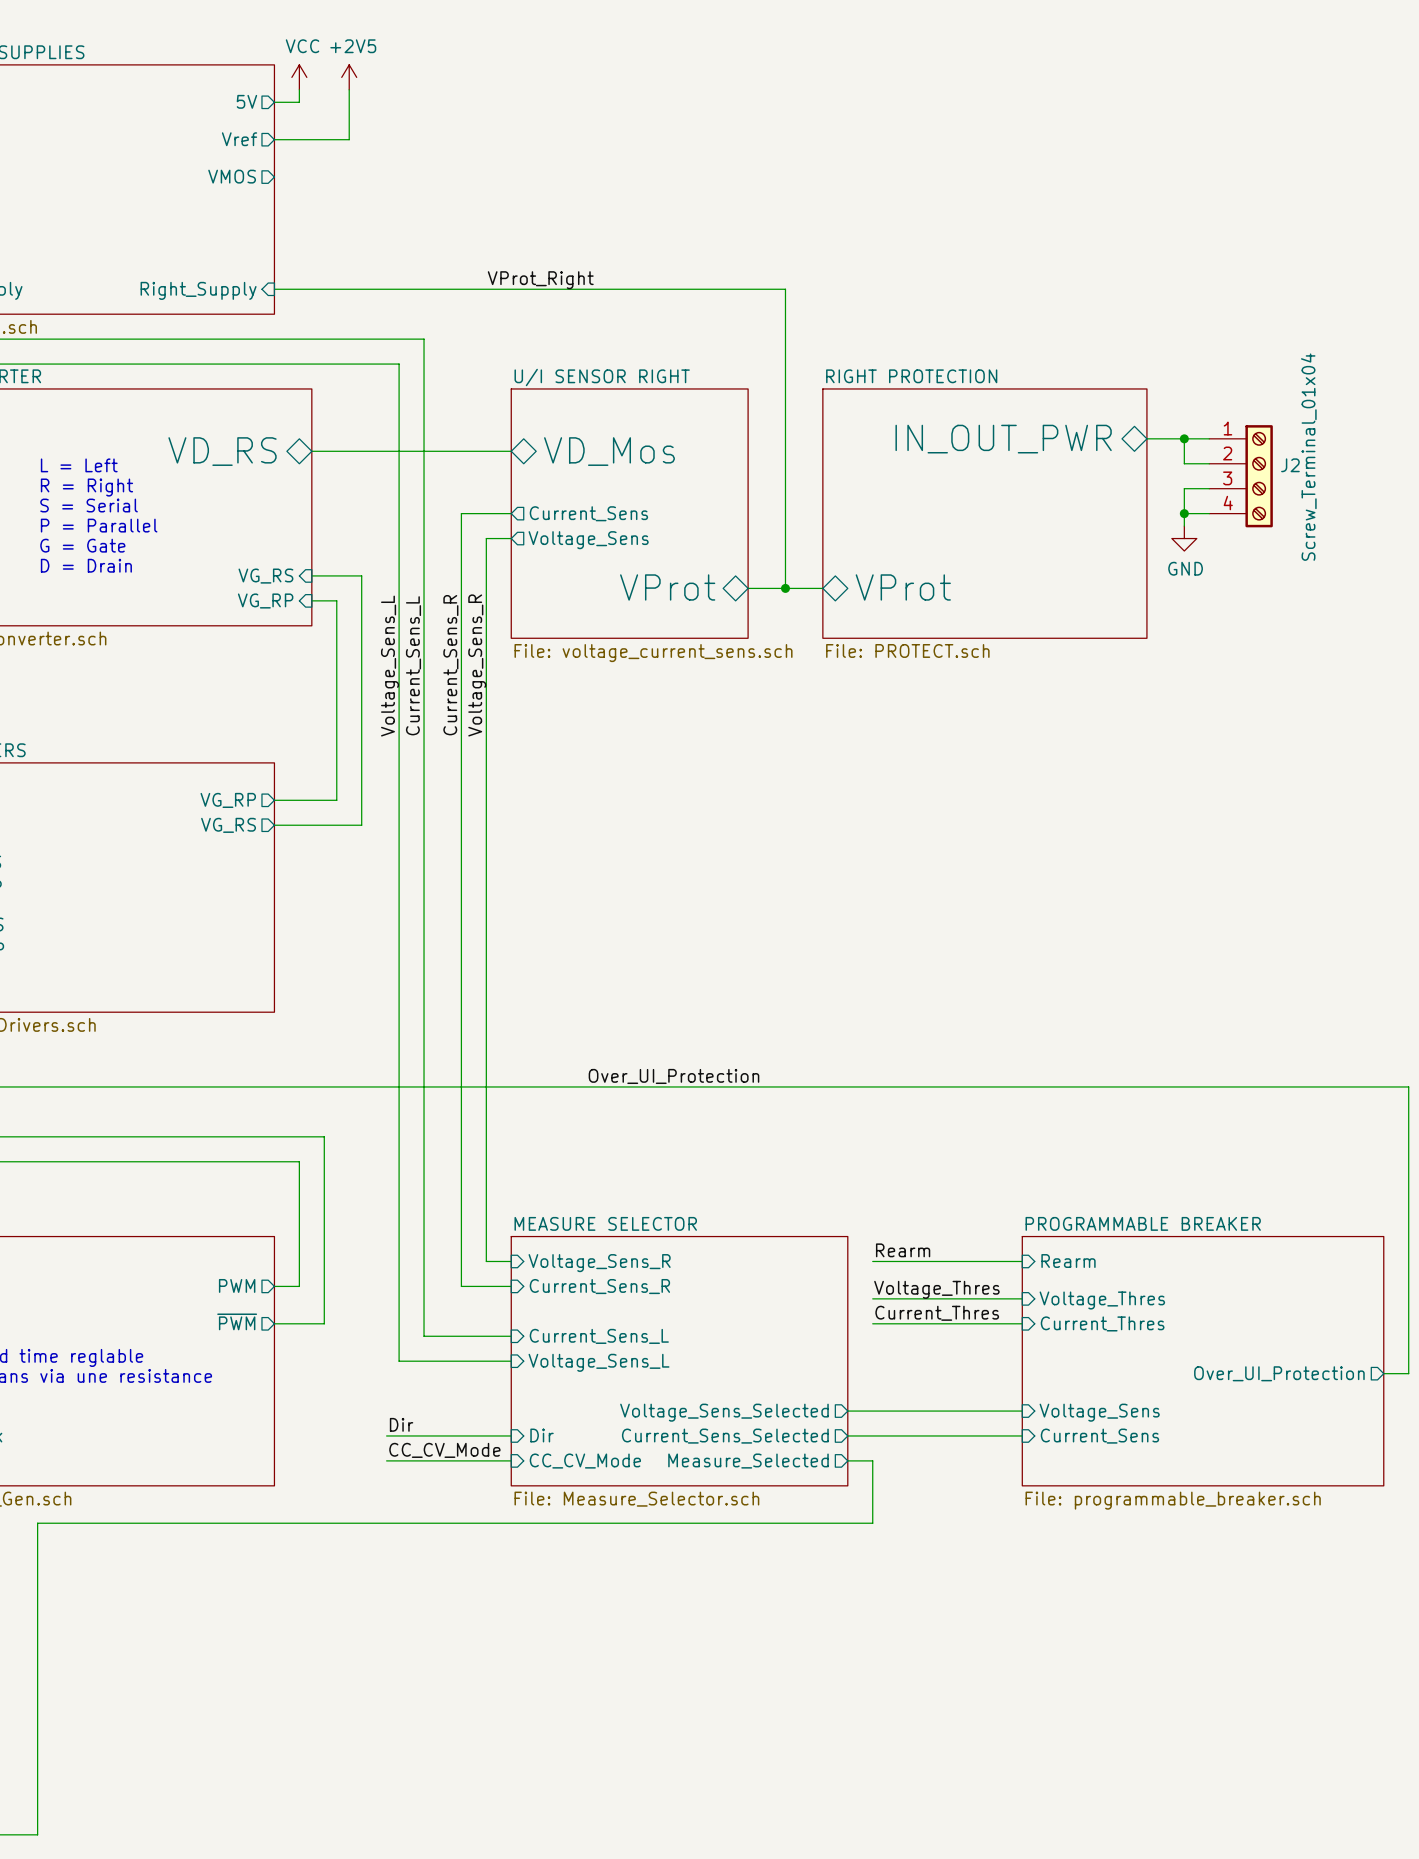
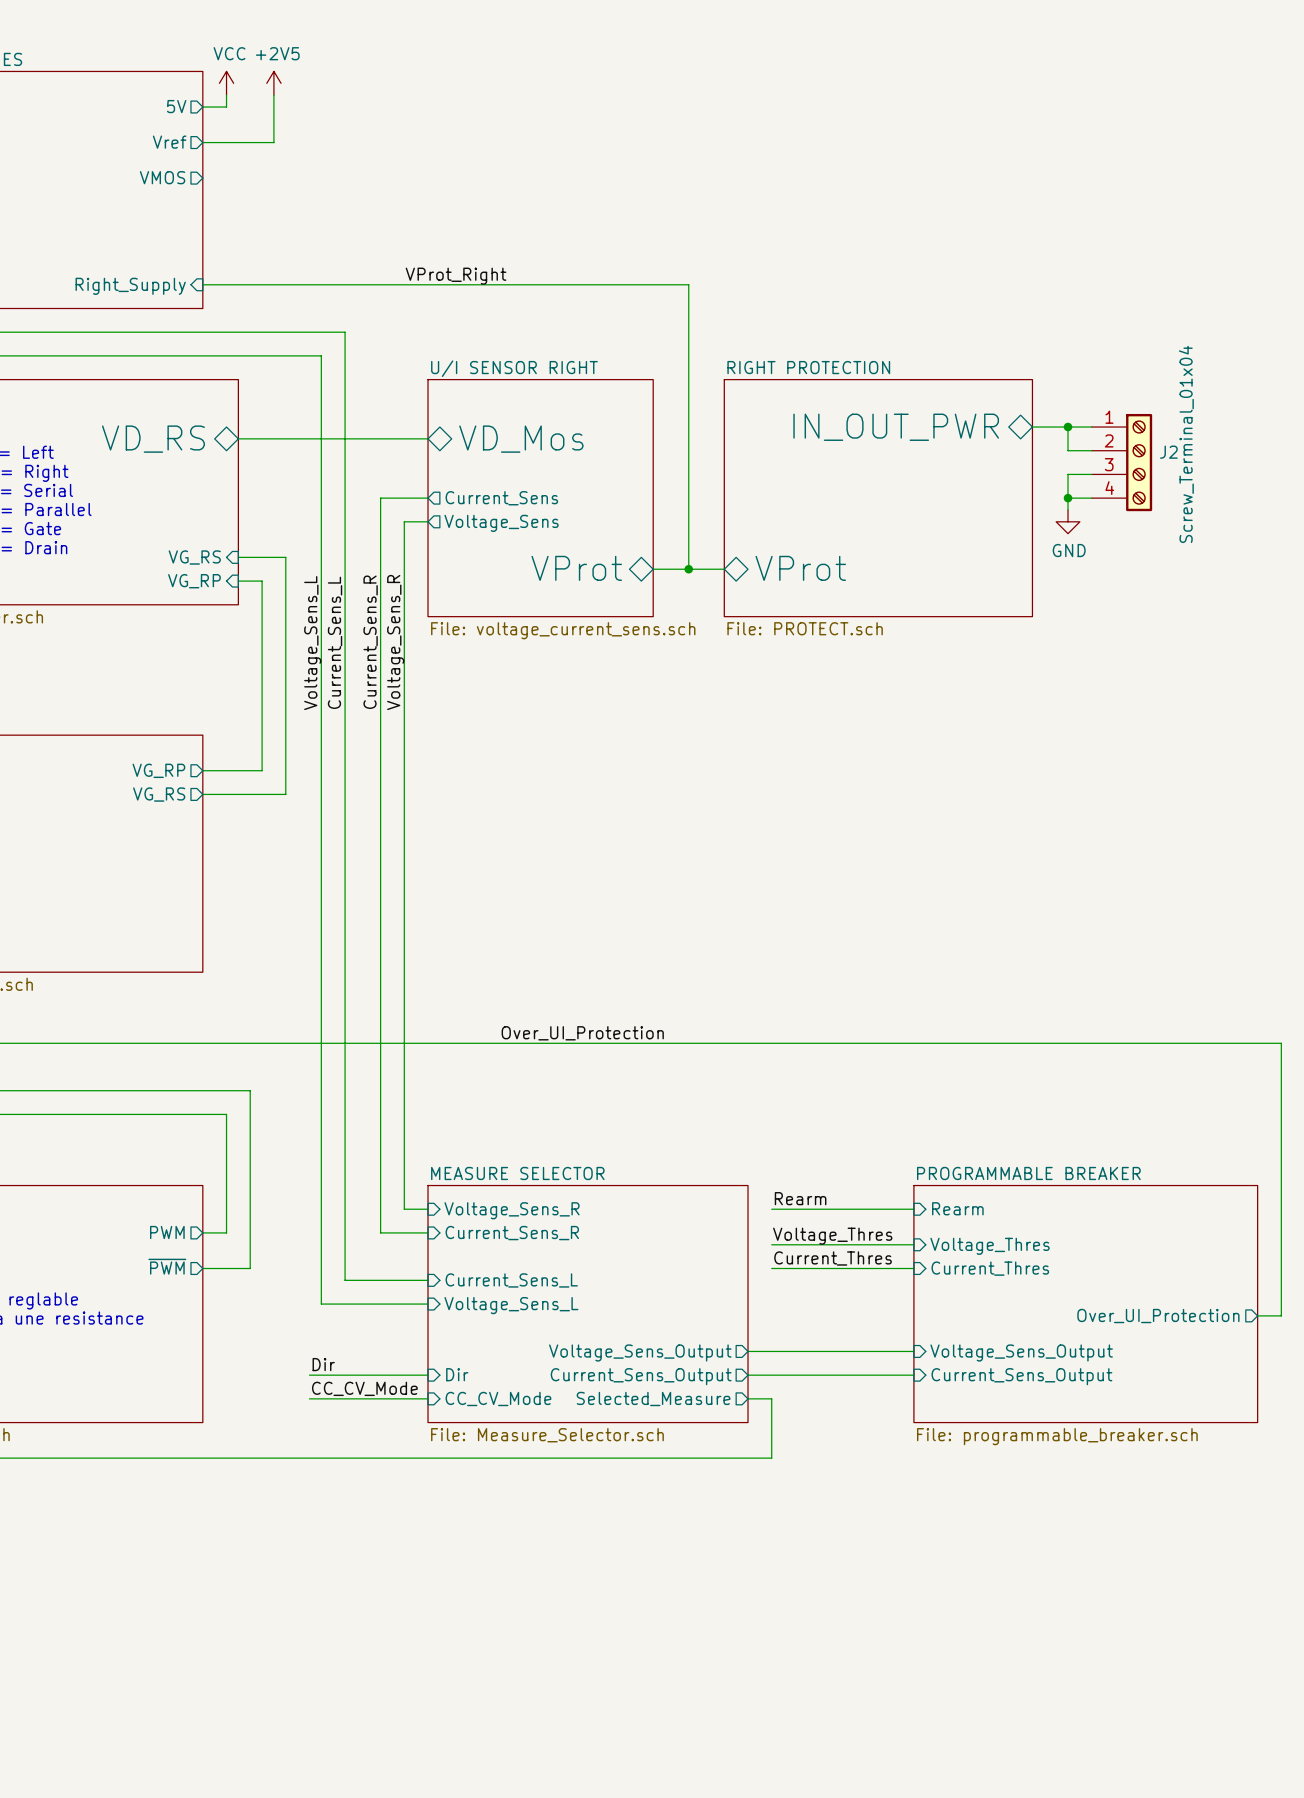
sheet pin: Voltage_Sens_Selected (724, 1412) -> Voltage_Sens_Output (640, 1352)
sheet pin: Voltage_Sens (1099, 1412) -> Voltage_Sens_Output (1021, 1352)
sheet pin: Current_Sens_Selected (725, 1436) -> Current_Sens_Output (641, 1376)
sheet pin: Current_Sens (1099, 1436) -> Current_Sens_Output (1021, 1376)
sheet pin: Measure_Selected (748, 1461) -> Selected_Measure (653, 1398)

